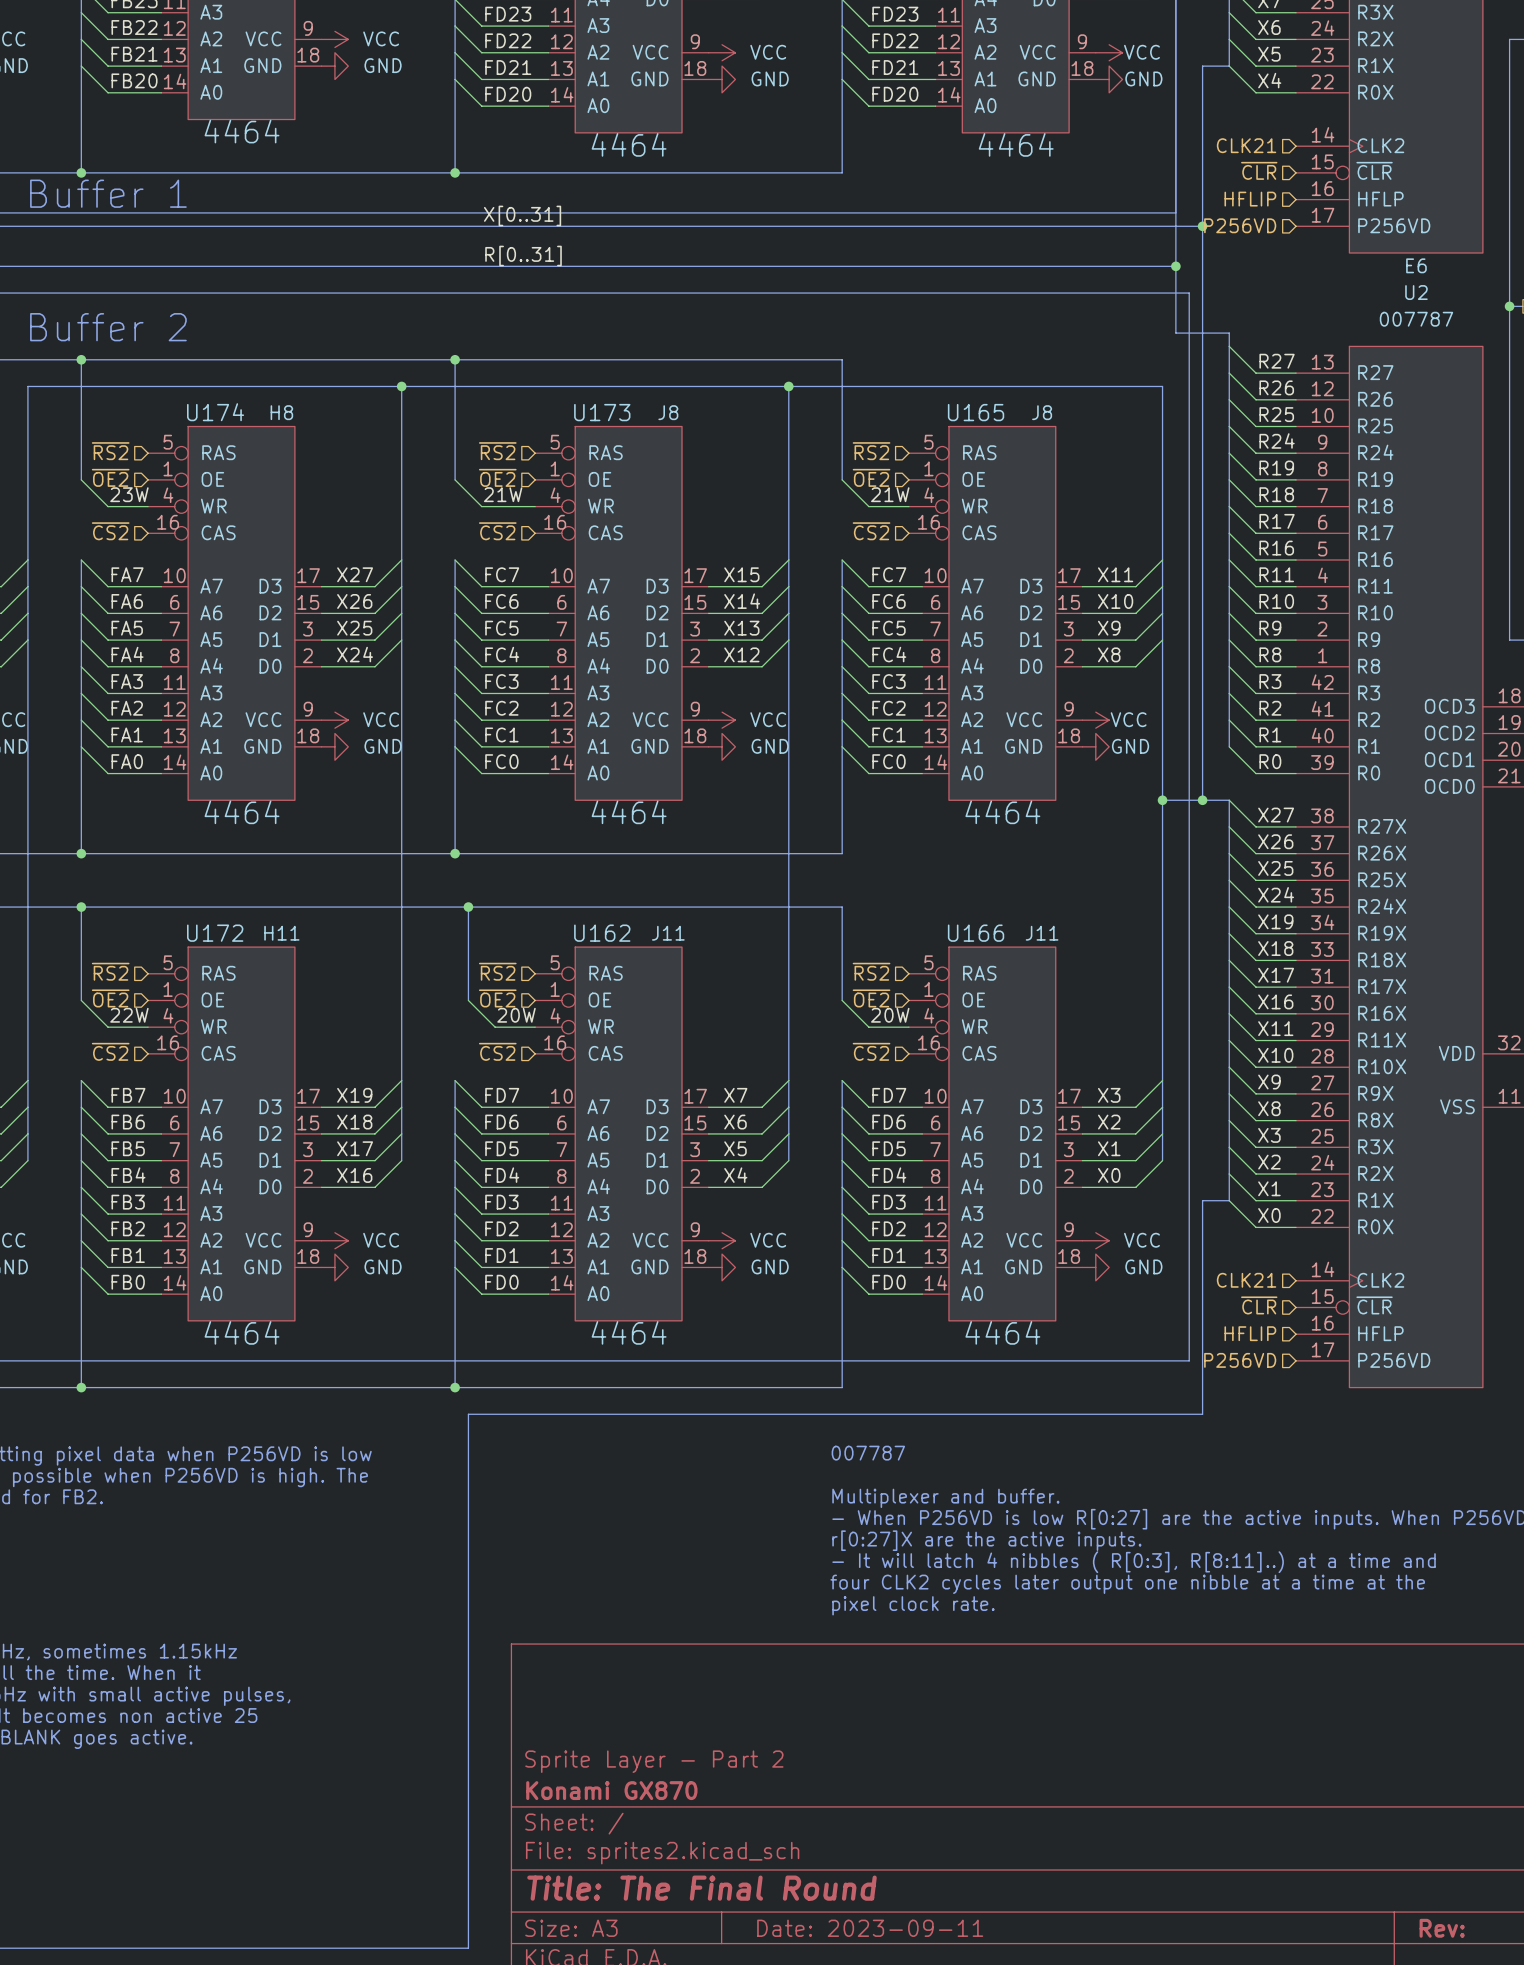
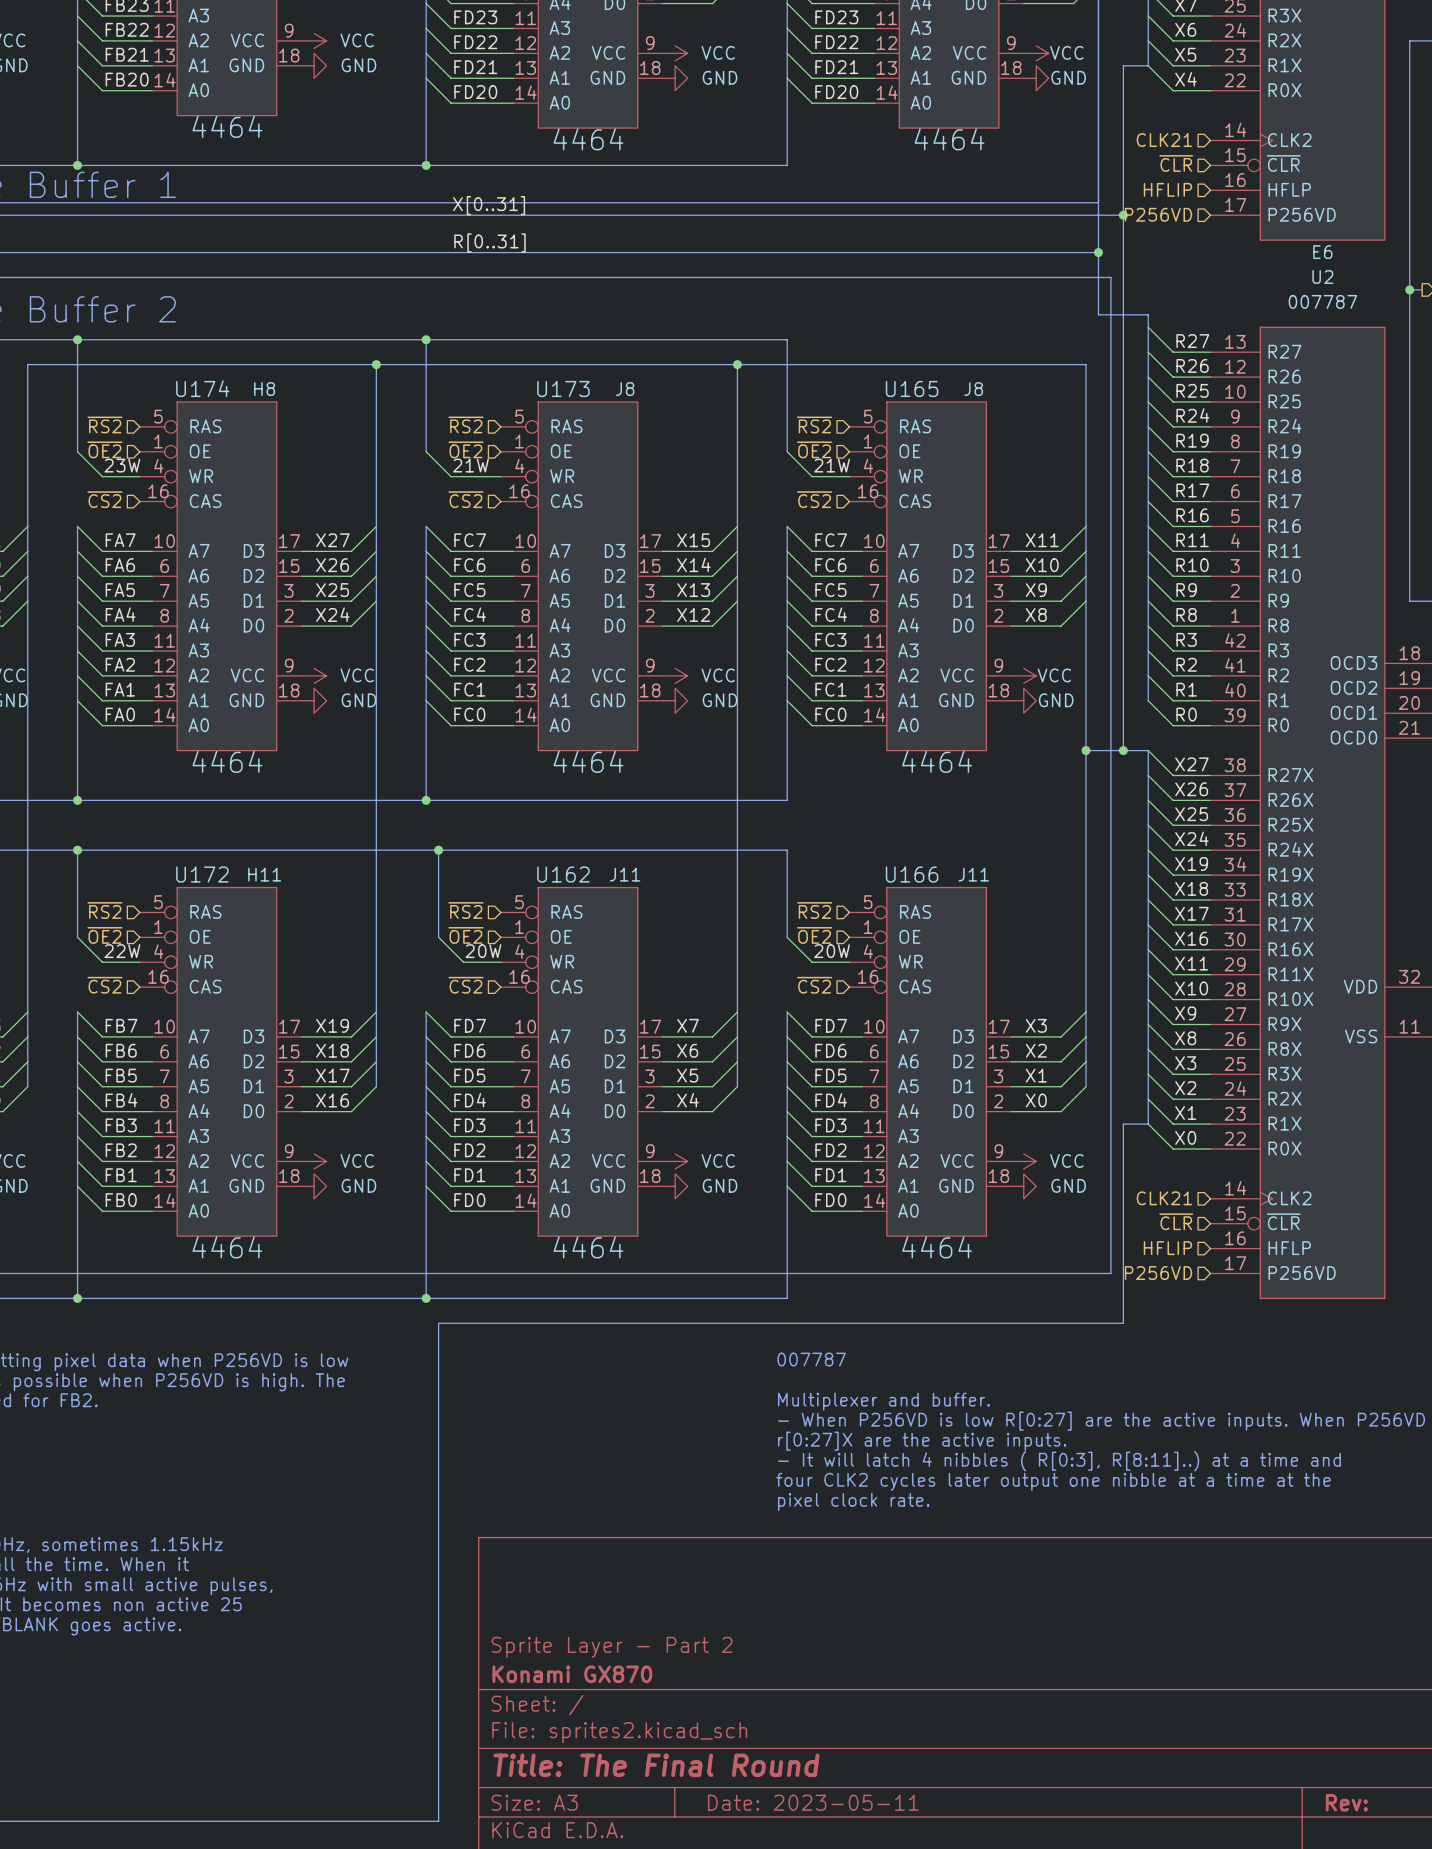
title block: Date: 2023-09-11 (870, 1928) -> Date: 2023-05-11 (813, 1802)

